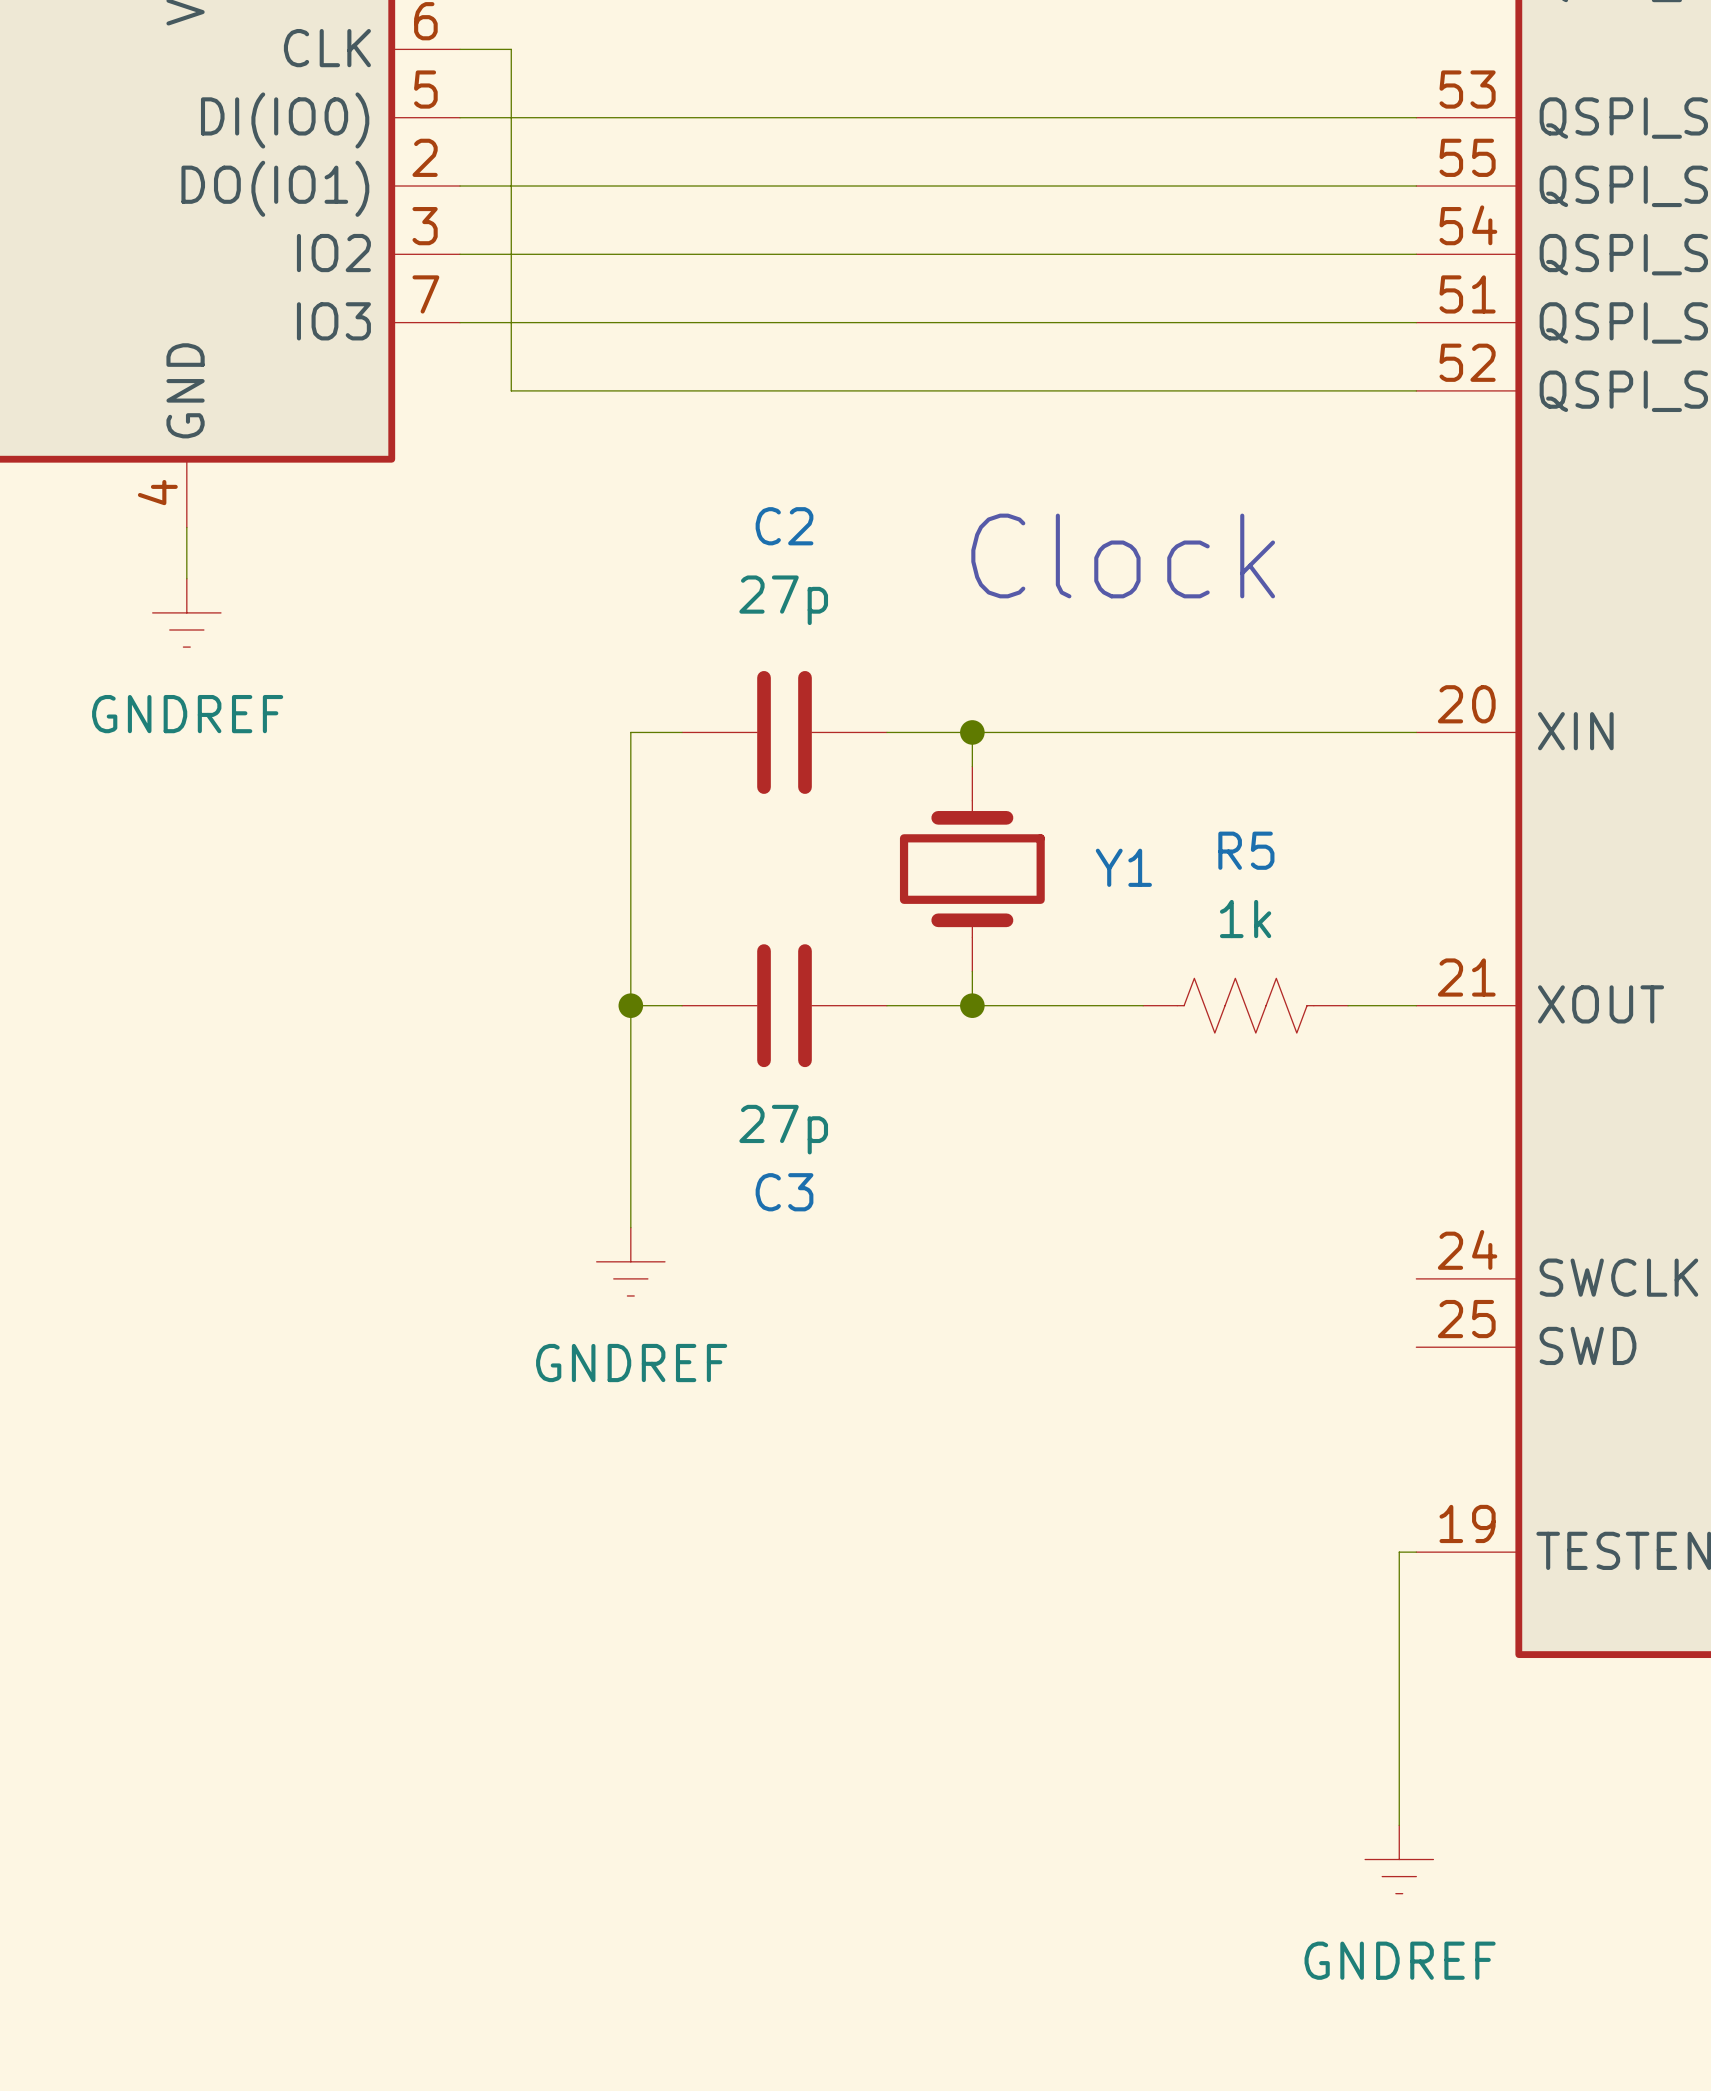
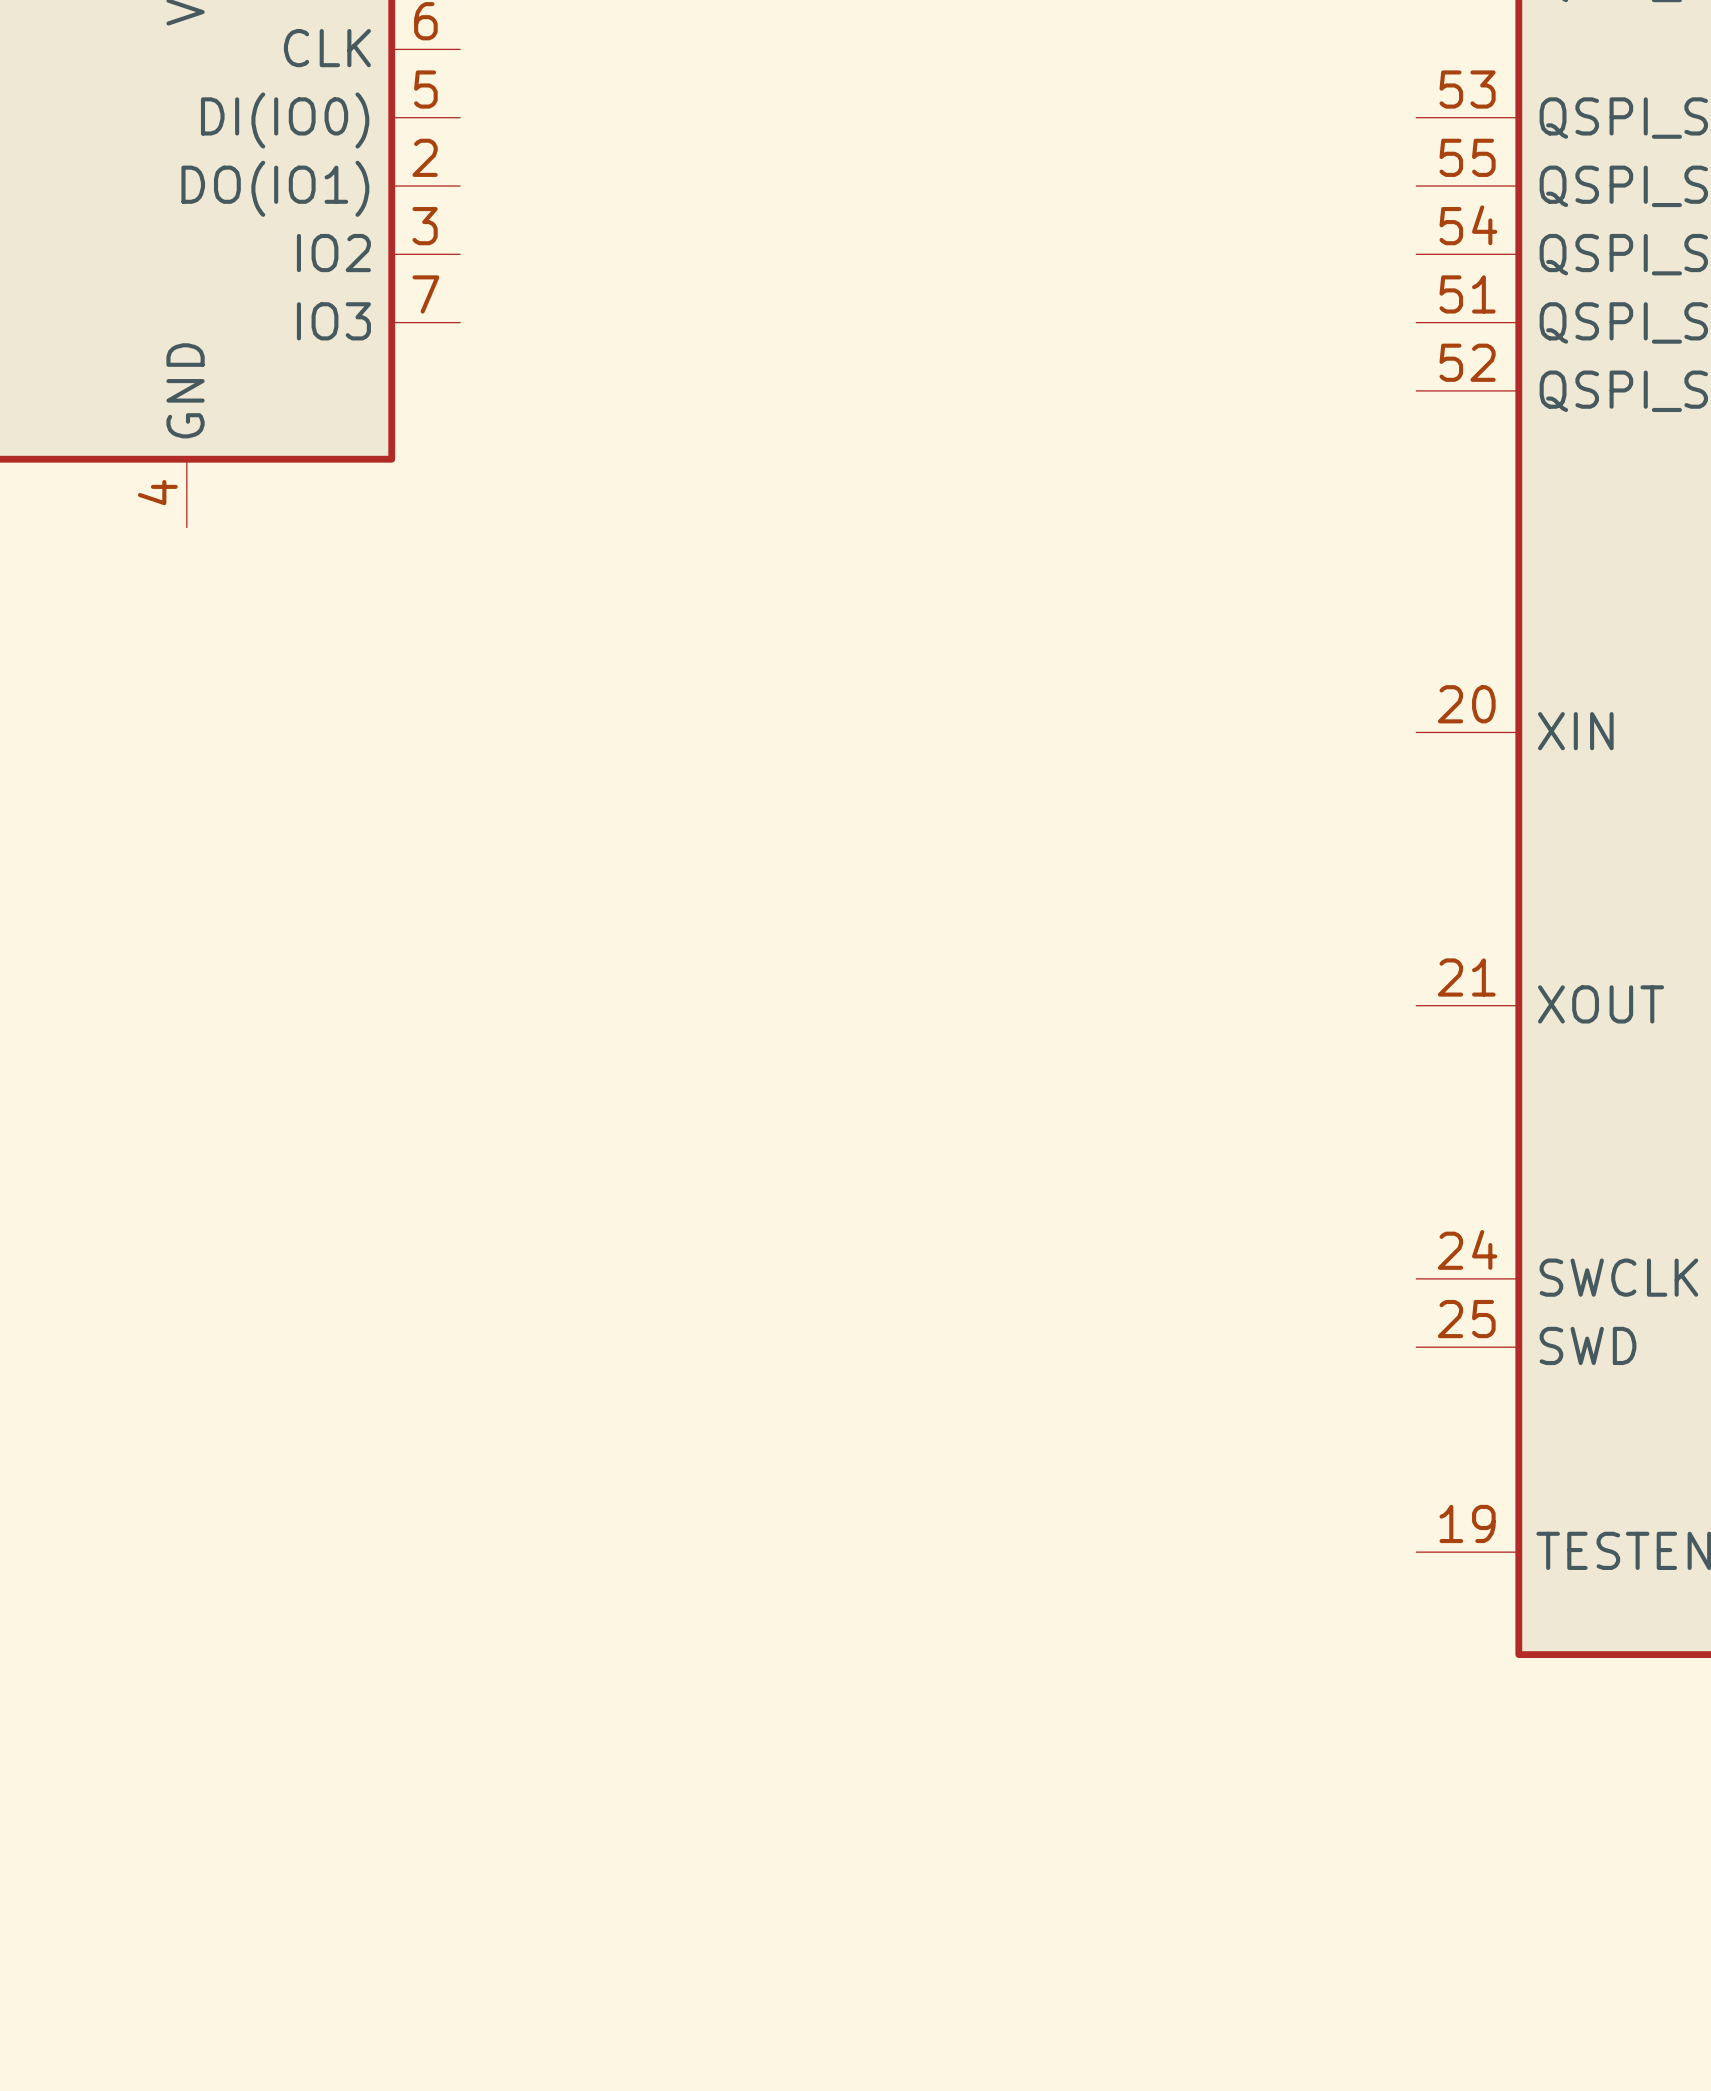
wire: (460, 49) (511, 49) (511, 390) (1416, 390) -> none
wire: (460, 117) (1416, 117) -> none
wire: (460, 186) (1416, 186) -> none
wire: (460, 254) (1416, 254) -> none
wire: (460, 322) (1416, 322) -> none
wire: (186, 527) (186, 578) -> none
text: Clock (1123, 555) -> none
power symbol: GNDREF (186, 612) -> none
wire: (682, 732) (630, 732) (630, 1227) -> none
C2: 27p (784, 732) -> none
wire: (886, 732) (1416, 732) -> none
wire: (972, 732) (972, 766) -> none
junction: (972, 732) -> none
Y1: (972, 869) -> none
wire: (972, 971) (972, 1005) -> none
wire: (630, 1005) (682, 1005) -> none
junction: (630, 1005) -> none
C3: 27p (784, 1005) -> none
wire: (886, 1005) (1143, 1005) -> none
junction: (972, 1005) -> none
R5: 1k (1245, 1005) -> none
wire: (1348, 1005) (1416, 1005) -> none
power symbol: GNDREF (630, 1261) -> none
wire: (1416, 1552) (1399, 1552) (1399, 1825) -> none
power symbol: GNDREF (1399, 1859) -> none

